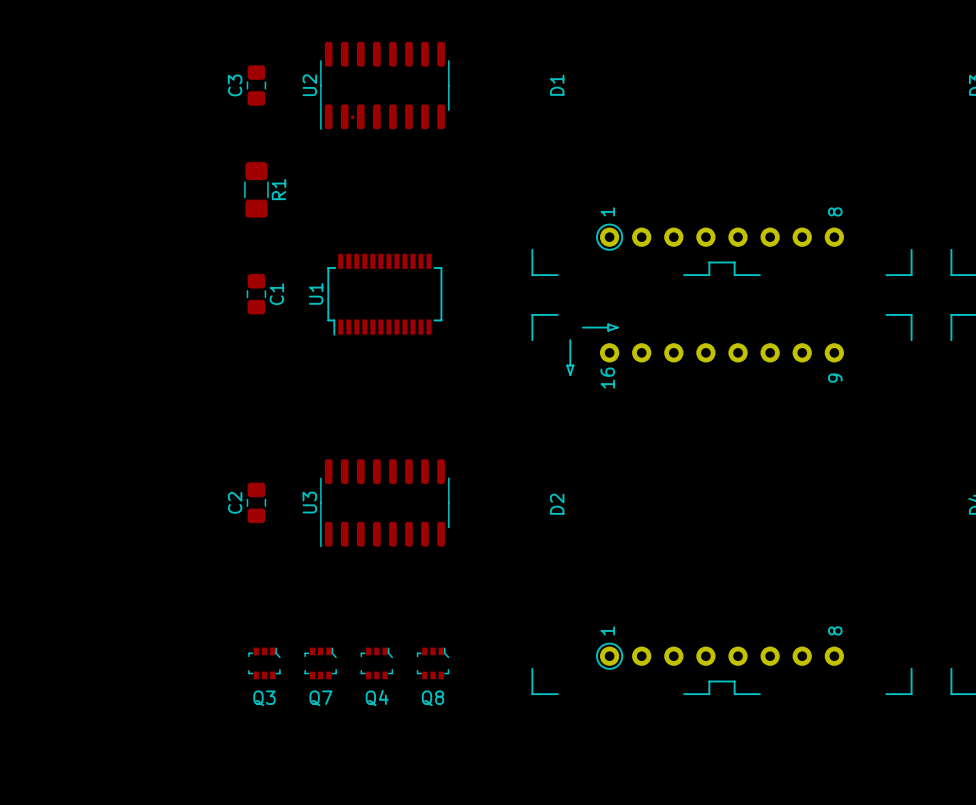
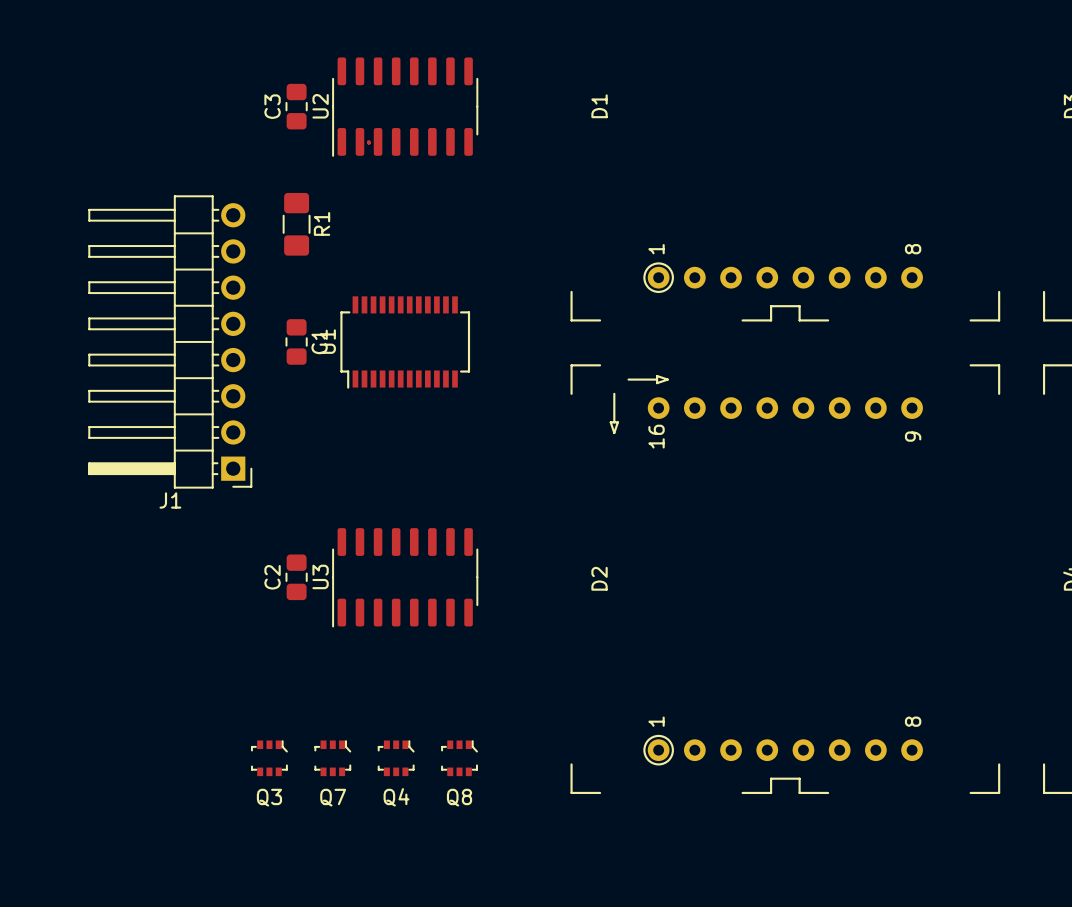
C3 position: (256, 85) -> (296, 106)
R1 position: (256, 189) -> (296, 224)
J1: none -> (170, 341)
C1 position: (256, 294) -> (296, 341)
C2 position: (256, 502) -> (296, 577)

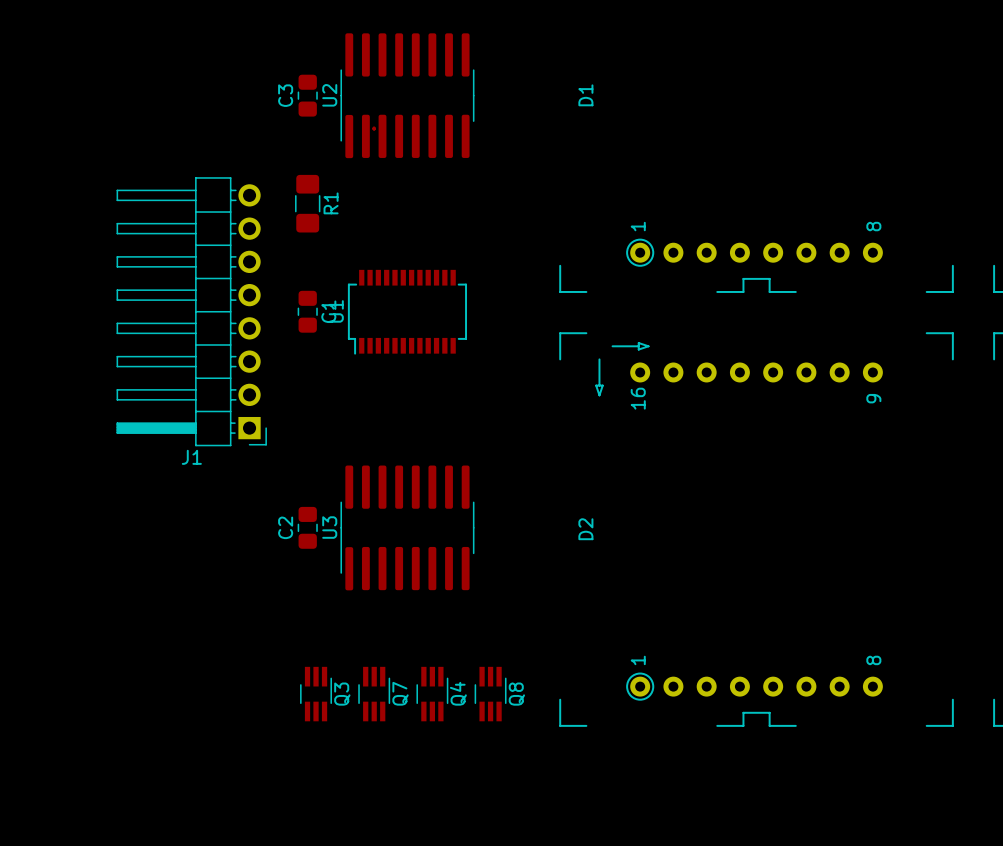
U2 footprint: [332, 57, 479, 157] -> [340, 33, 475, 159]
U3 footprint: [332, 528, 479, 628] -> [340, 465, 475, 591]
Q3 footprint: [251, 740, 288, 777] -> [300, 666, 332, 722]
Q7 footprint: [314, 740, 351, 777] -> [358, 666, 391, 722]
Q4 footprint: [377, 740, 415, 777] -> [416, 666, 449, 722]
Q8 footprint: [441, 740, 478, 777] -> [474, 666, 507, 722]
Q3 name position: Q3 (269, 797) -> Q3 (342, 694)
Q7 name position: Q7 (333, 797) -> Q7 (400, 693)
Q4 name position: Q4 (396, 797) -> Q4 (458, 693)
Q8 name position: Q8 (459, 797) -> Q8 (516, 694)

